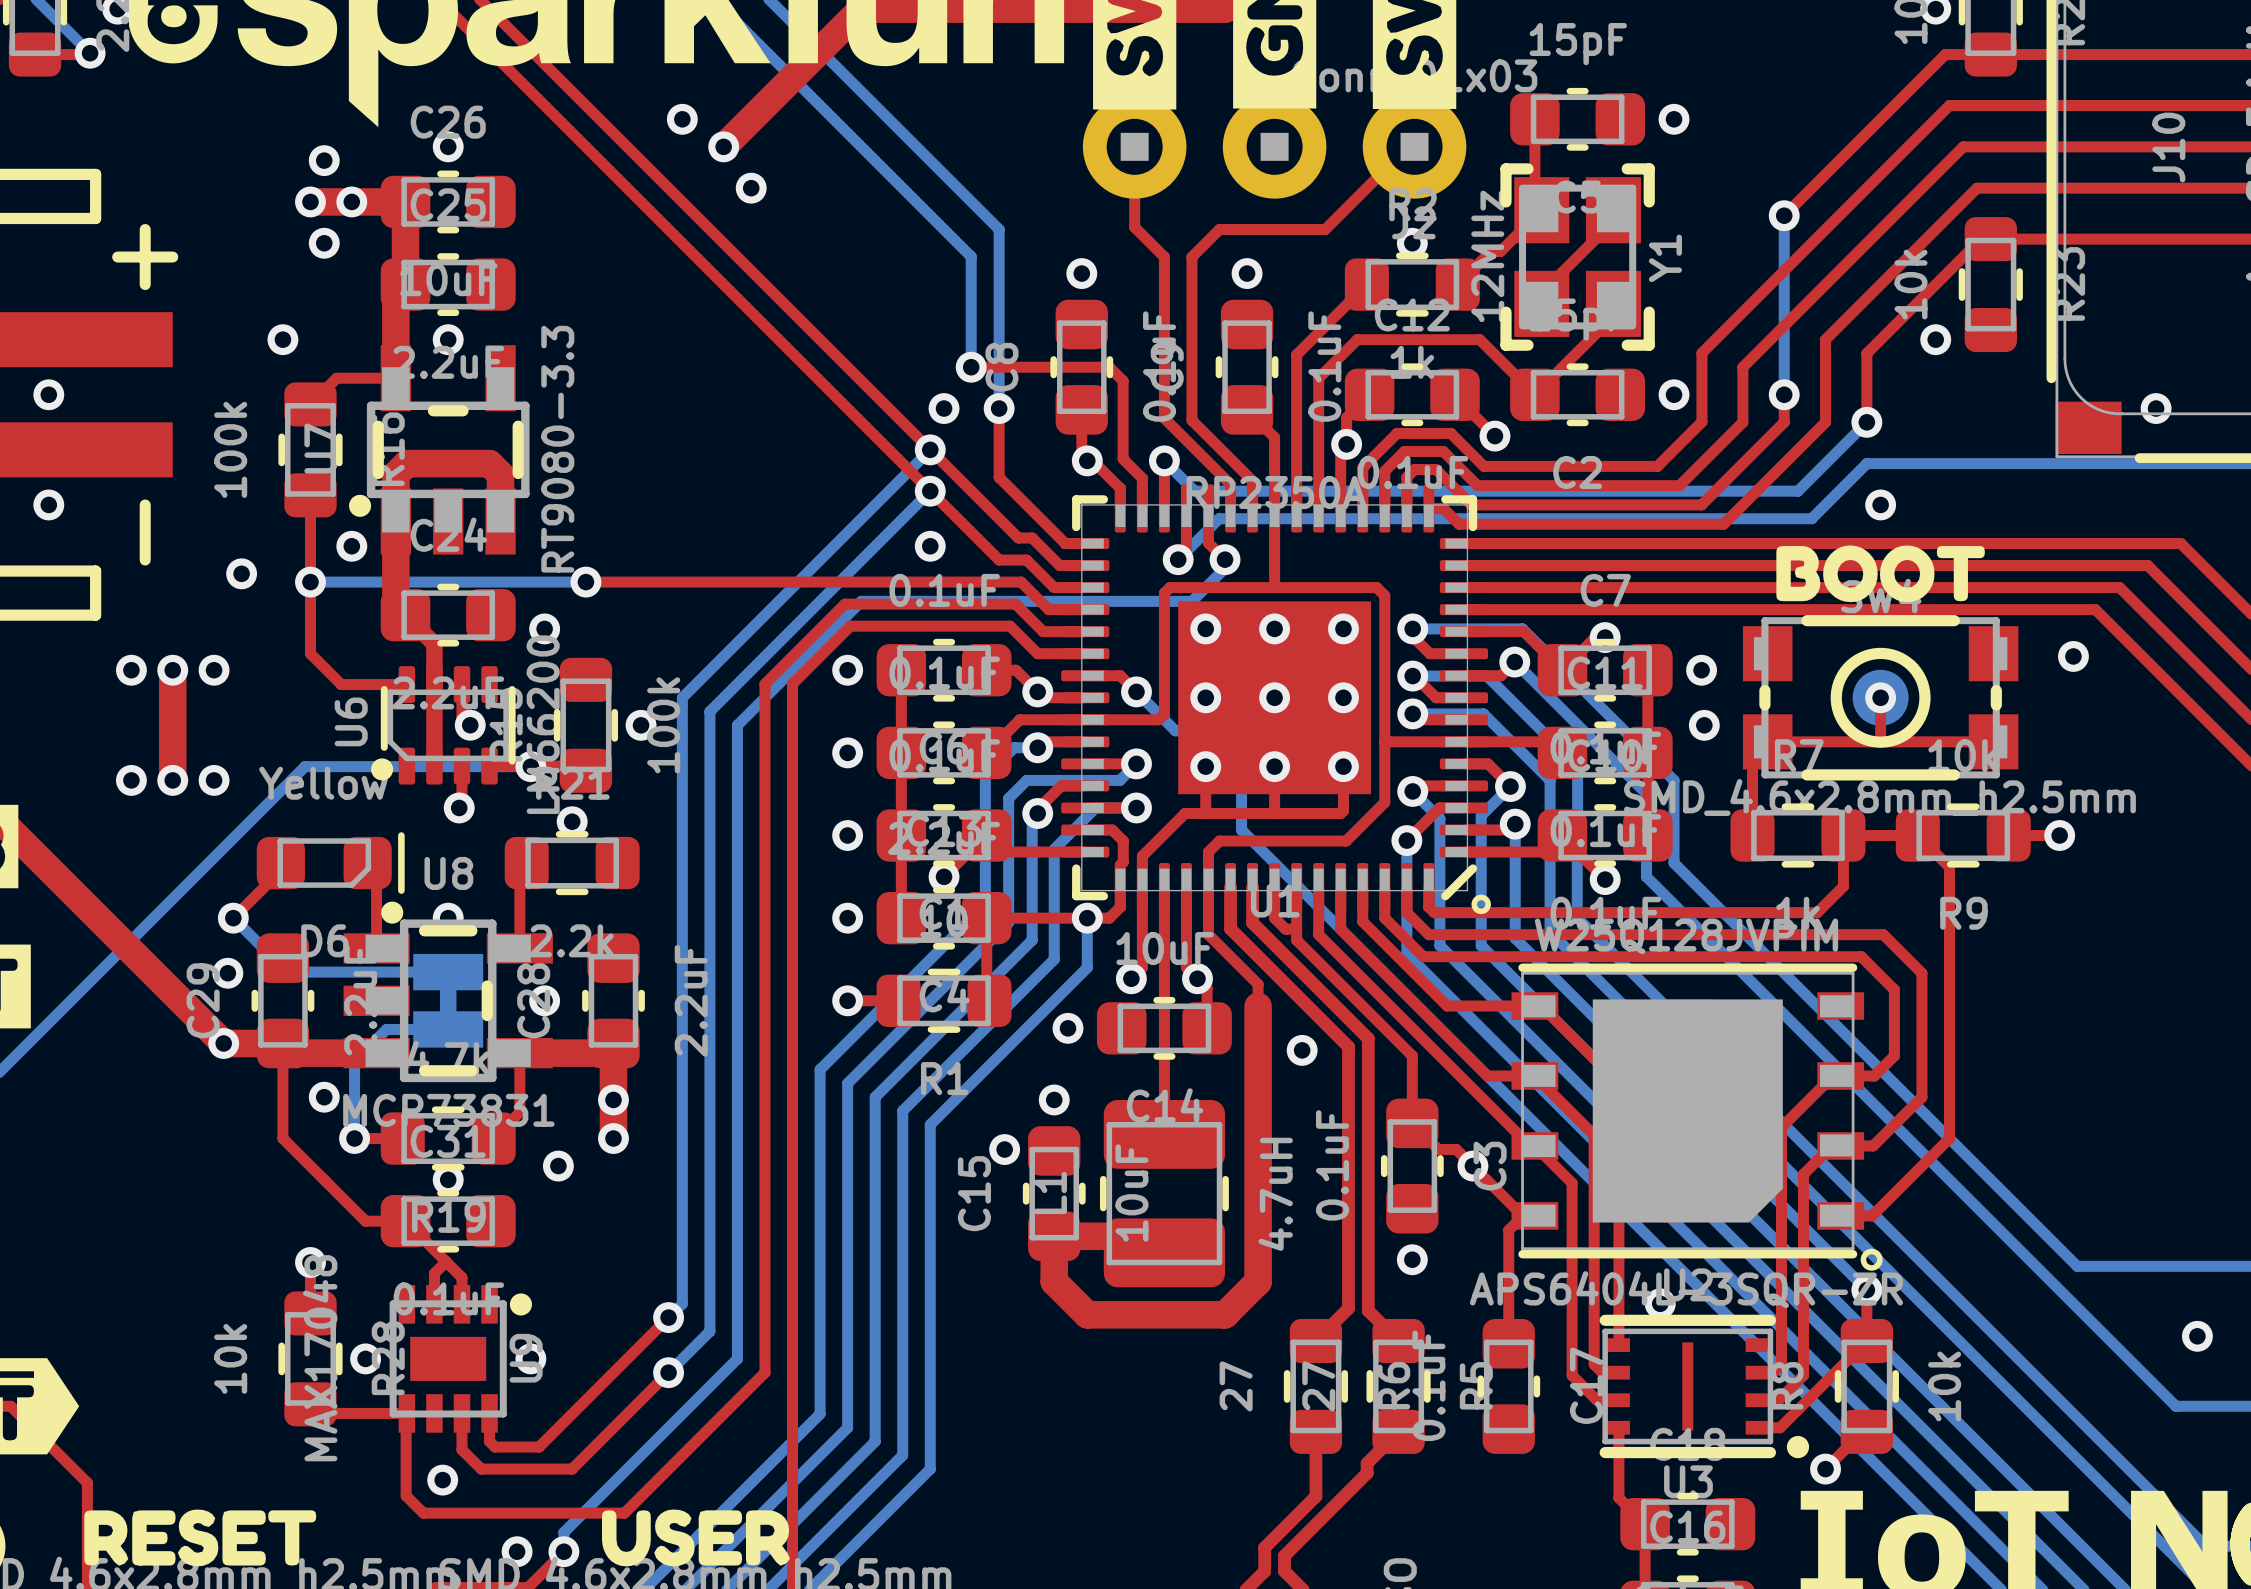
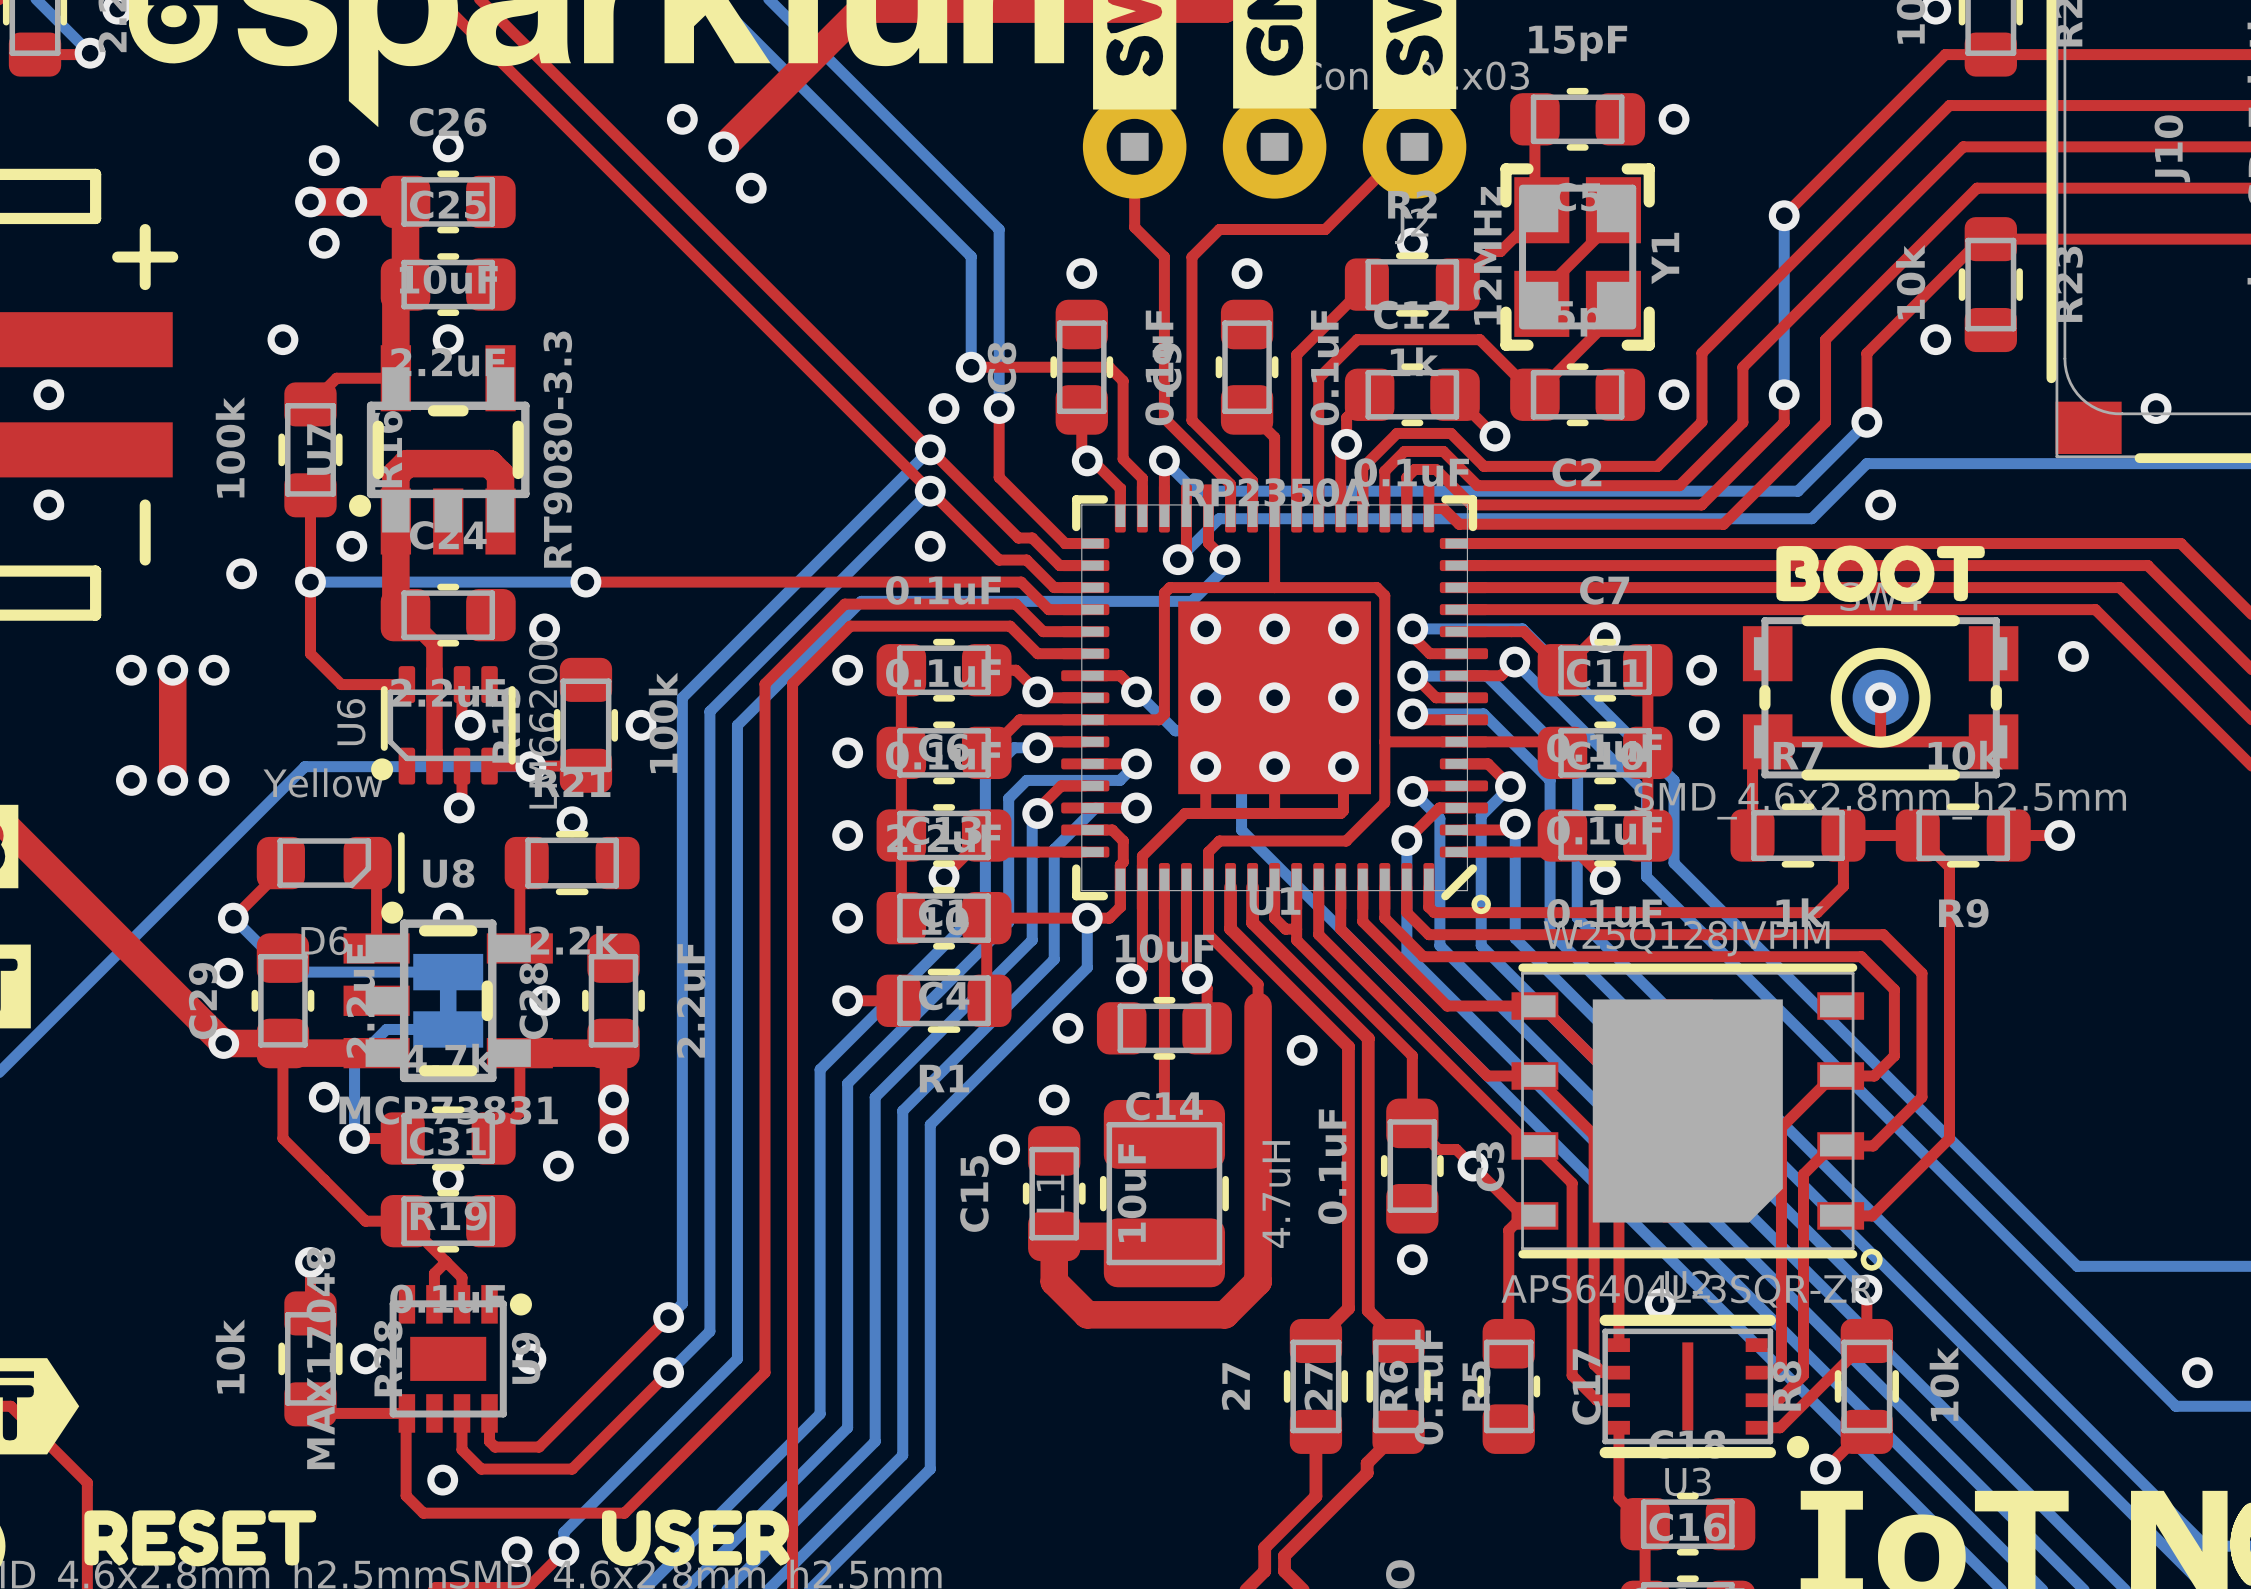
via position: (2197, 1336) -> (2197, 1372)

